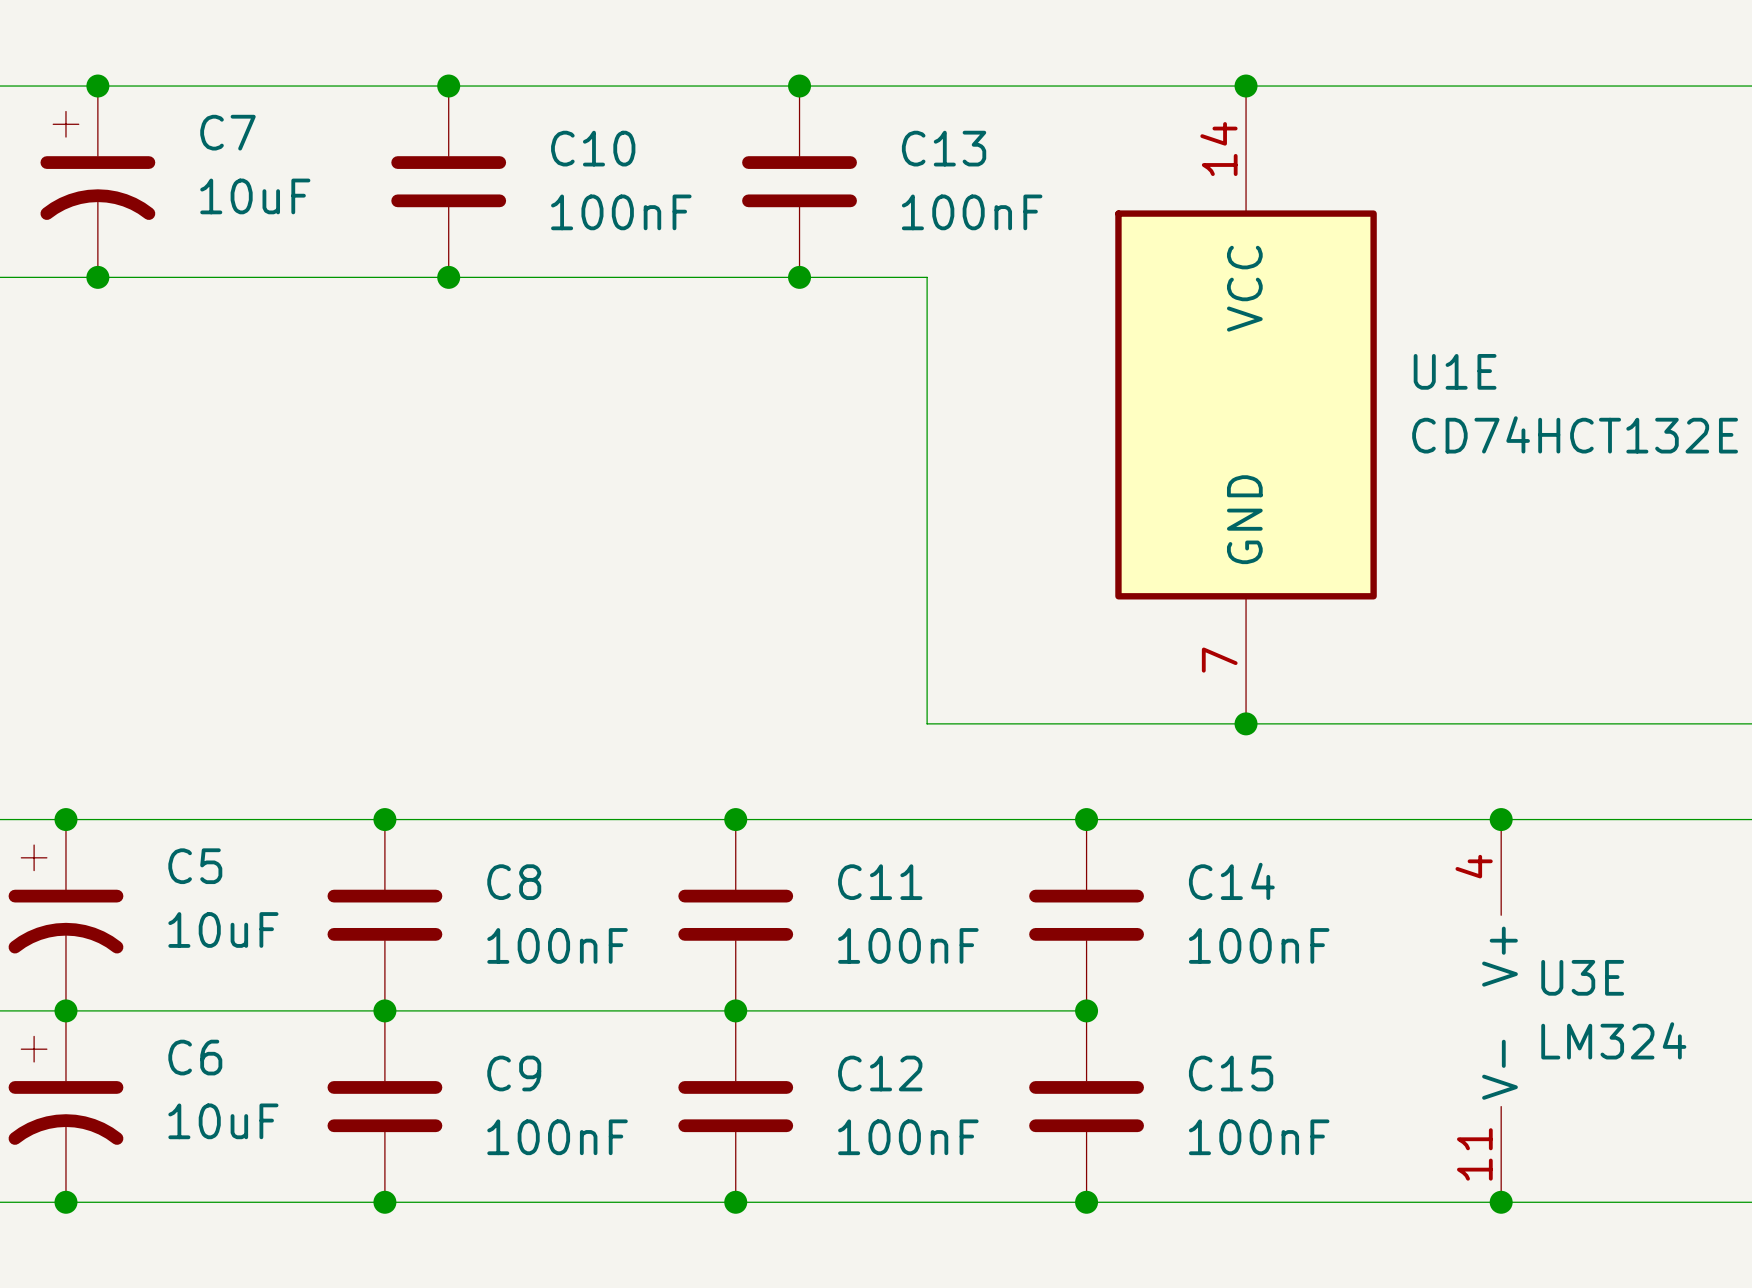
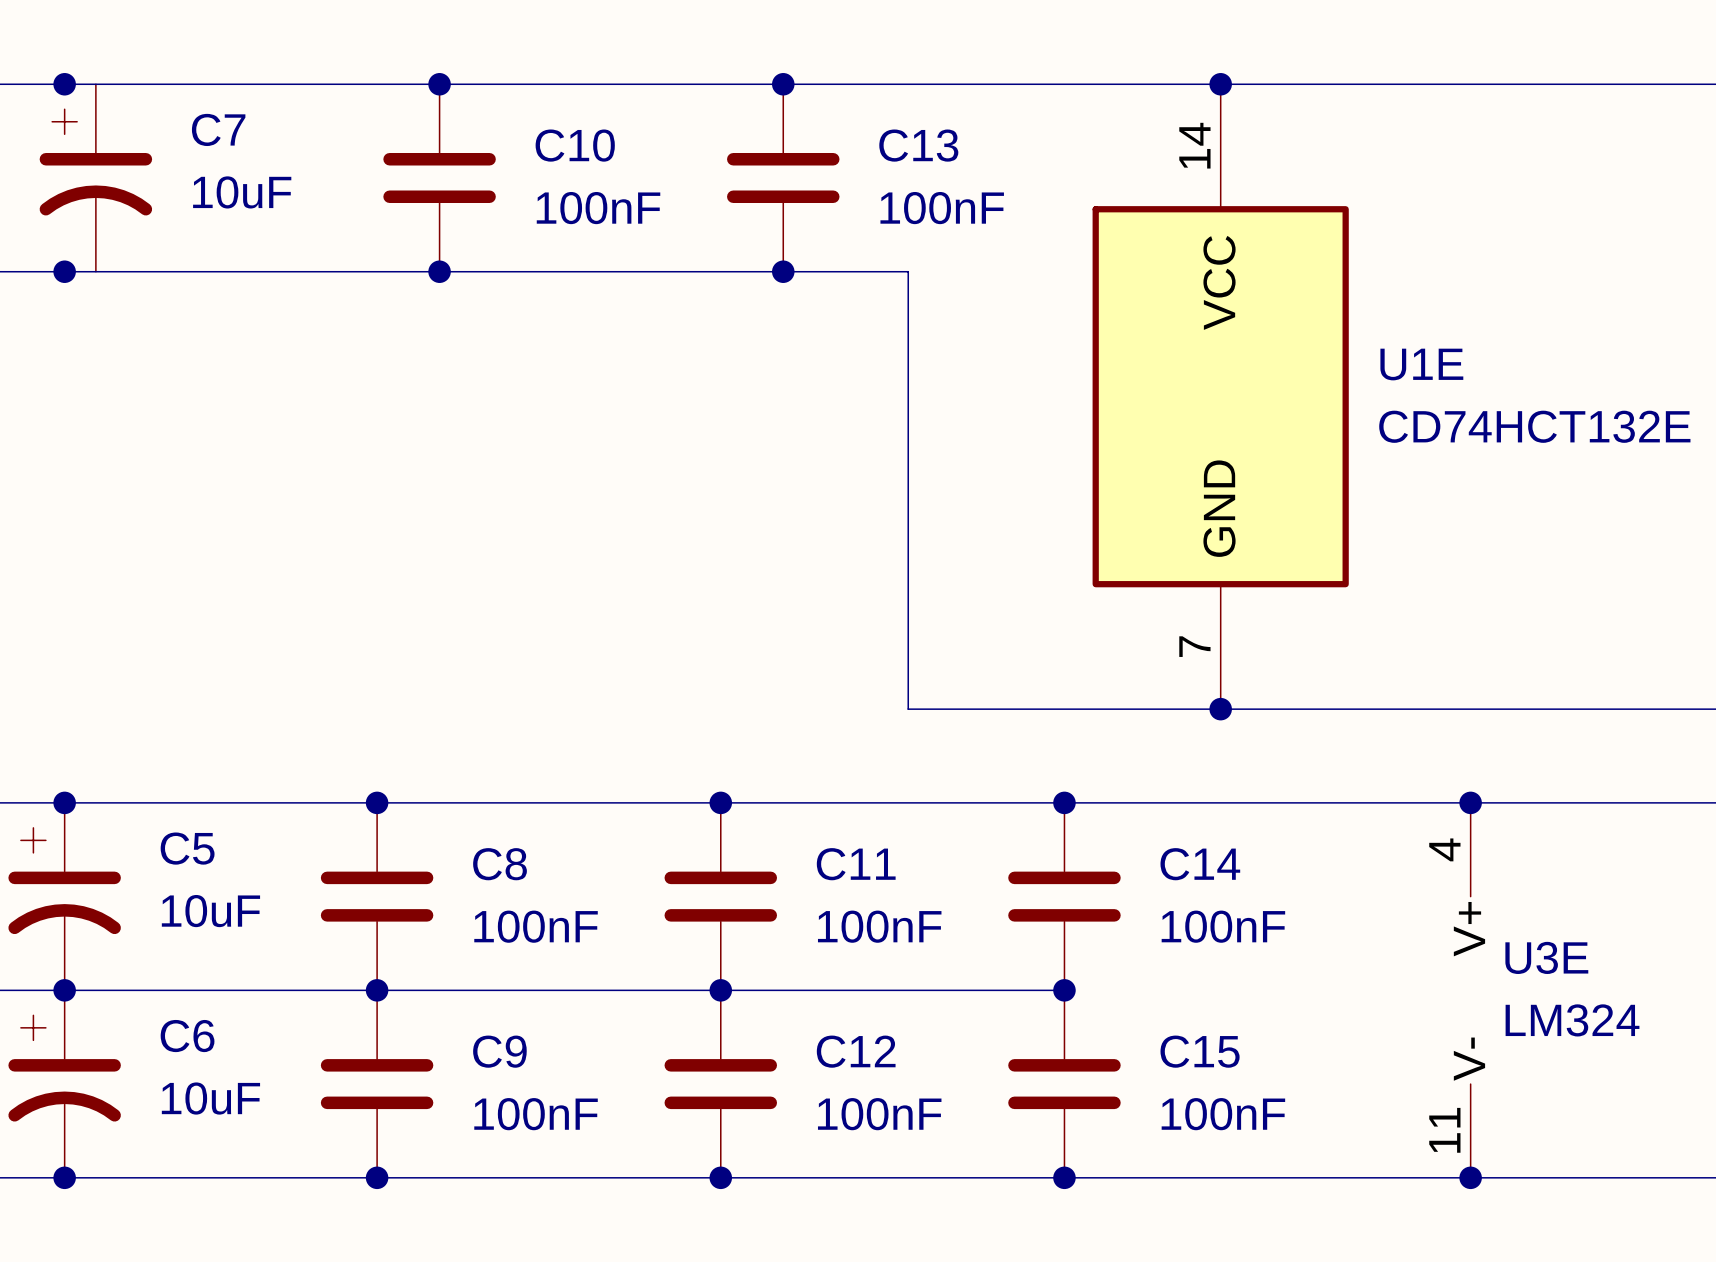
junction position: (97, 86) -> (64, 84)
junction position: (97, 277) -> (64, 271)

